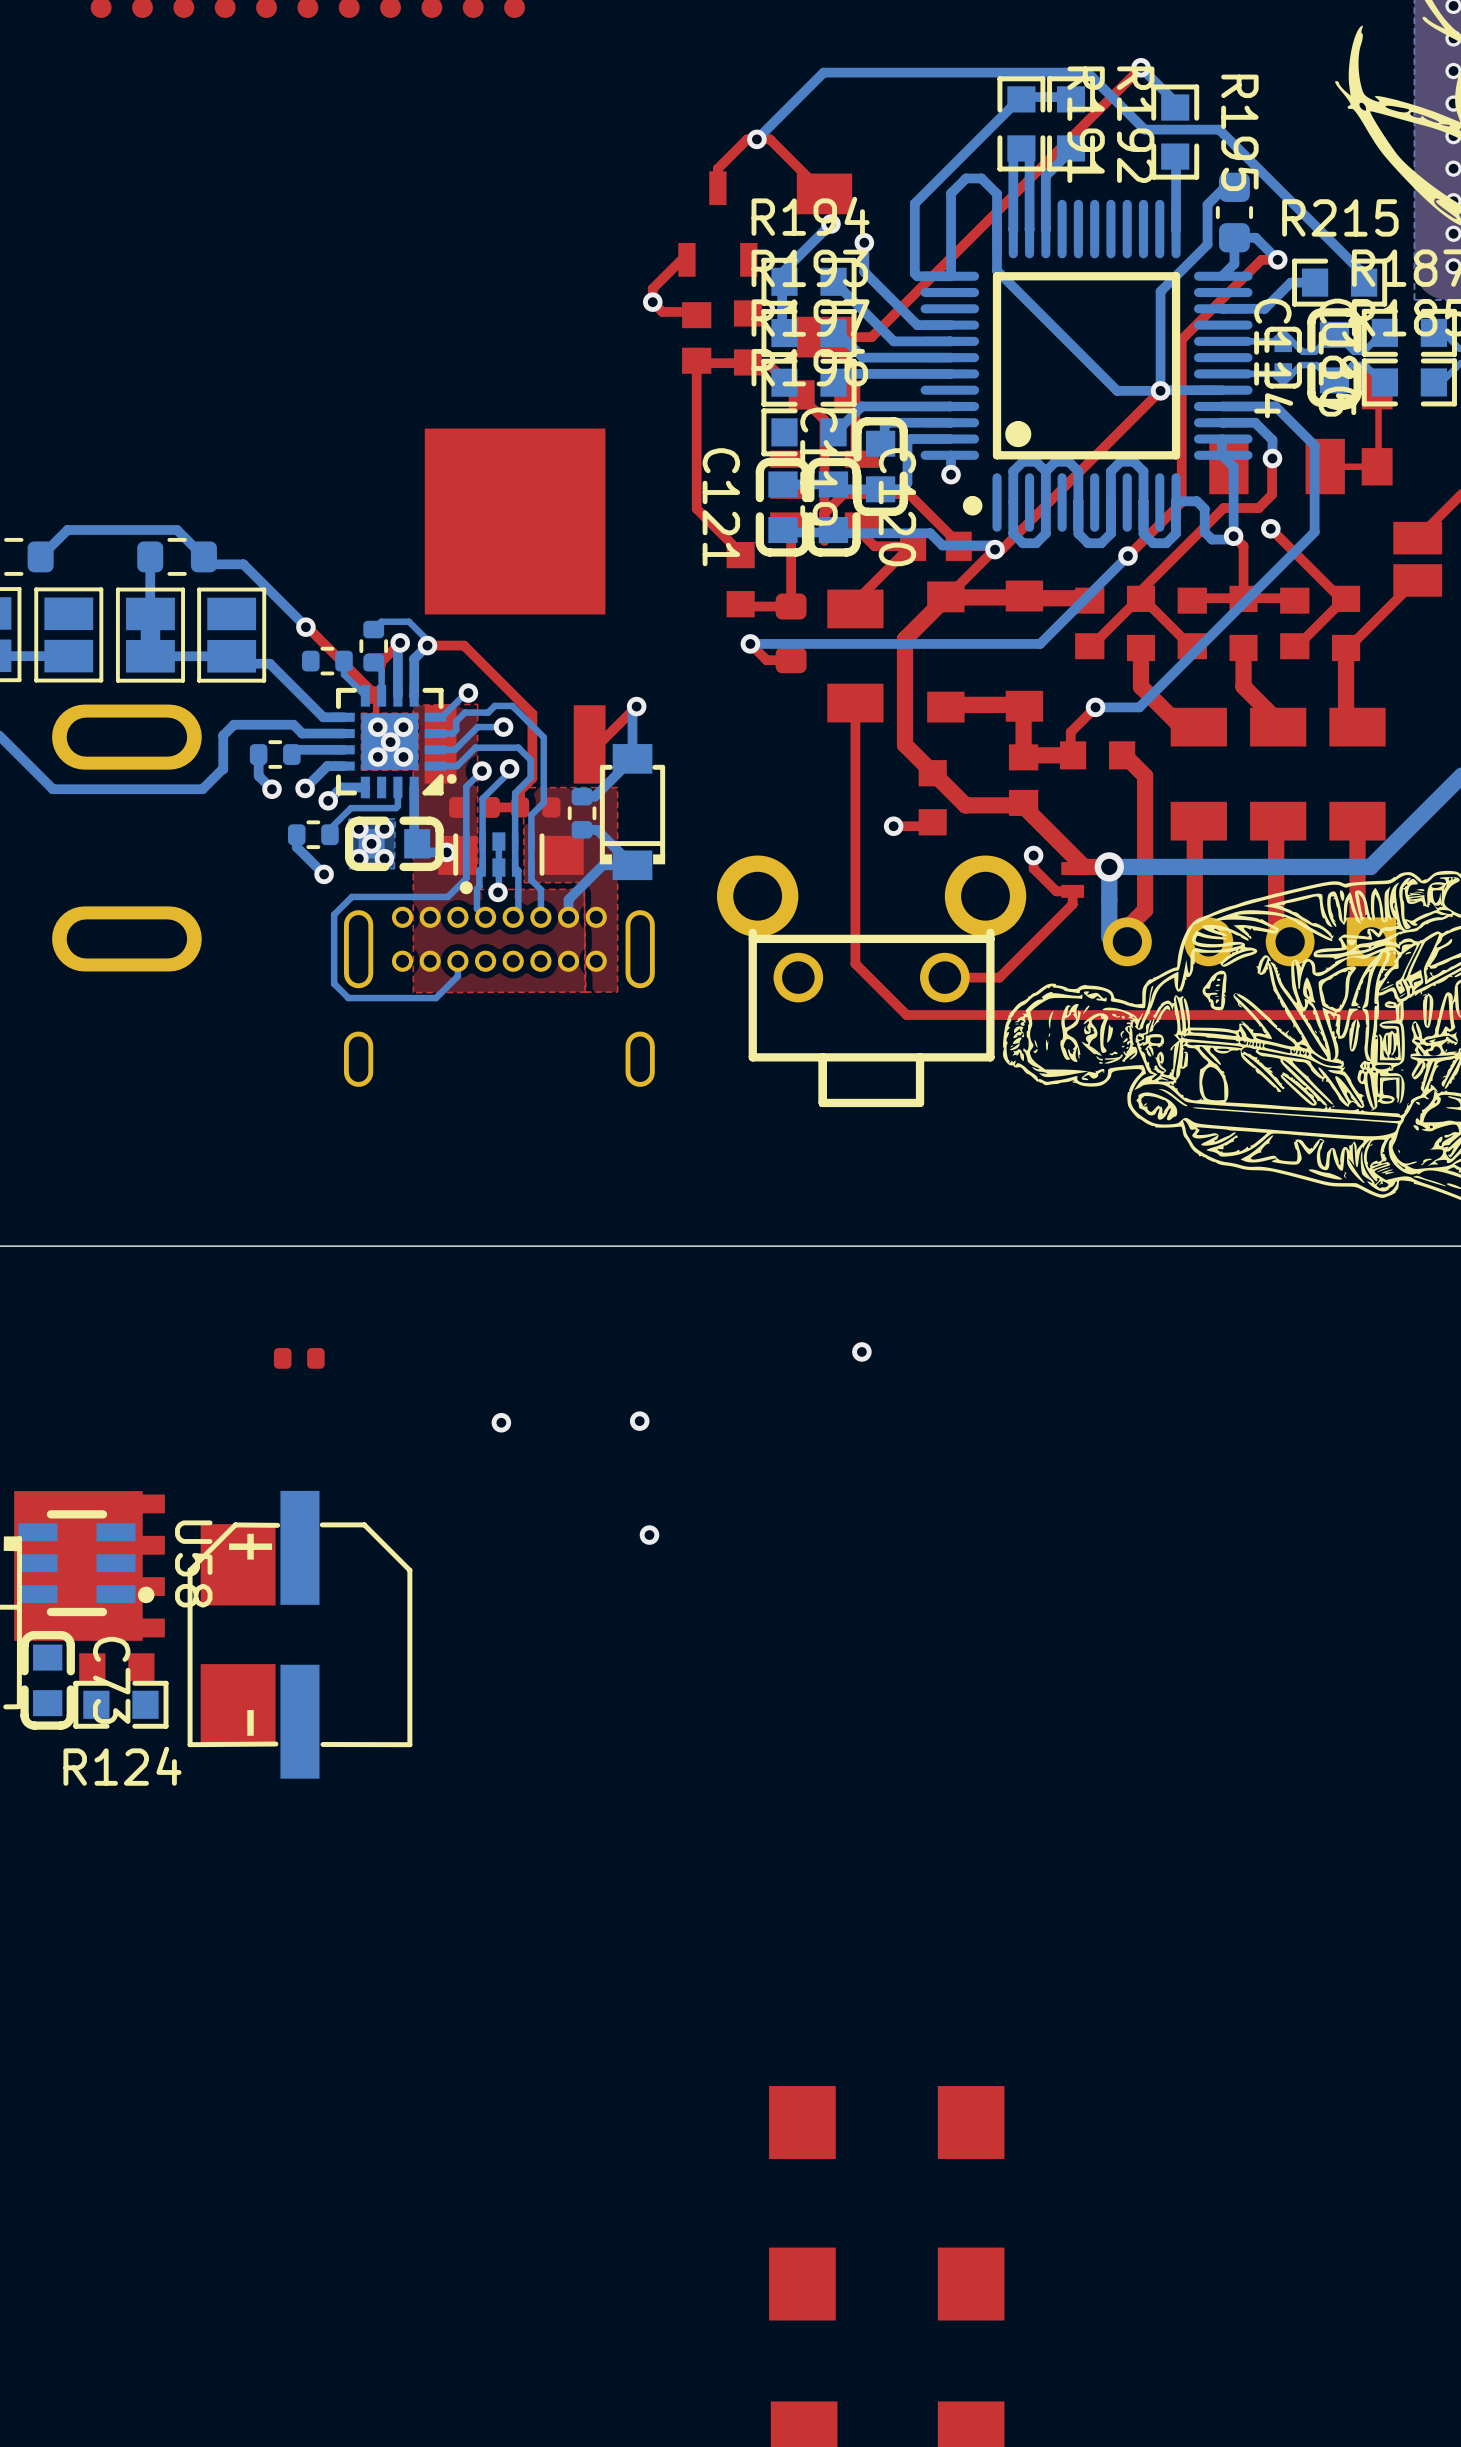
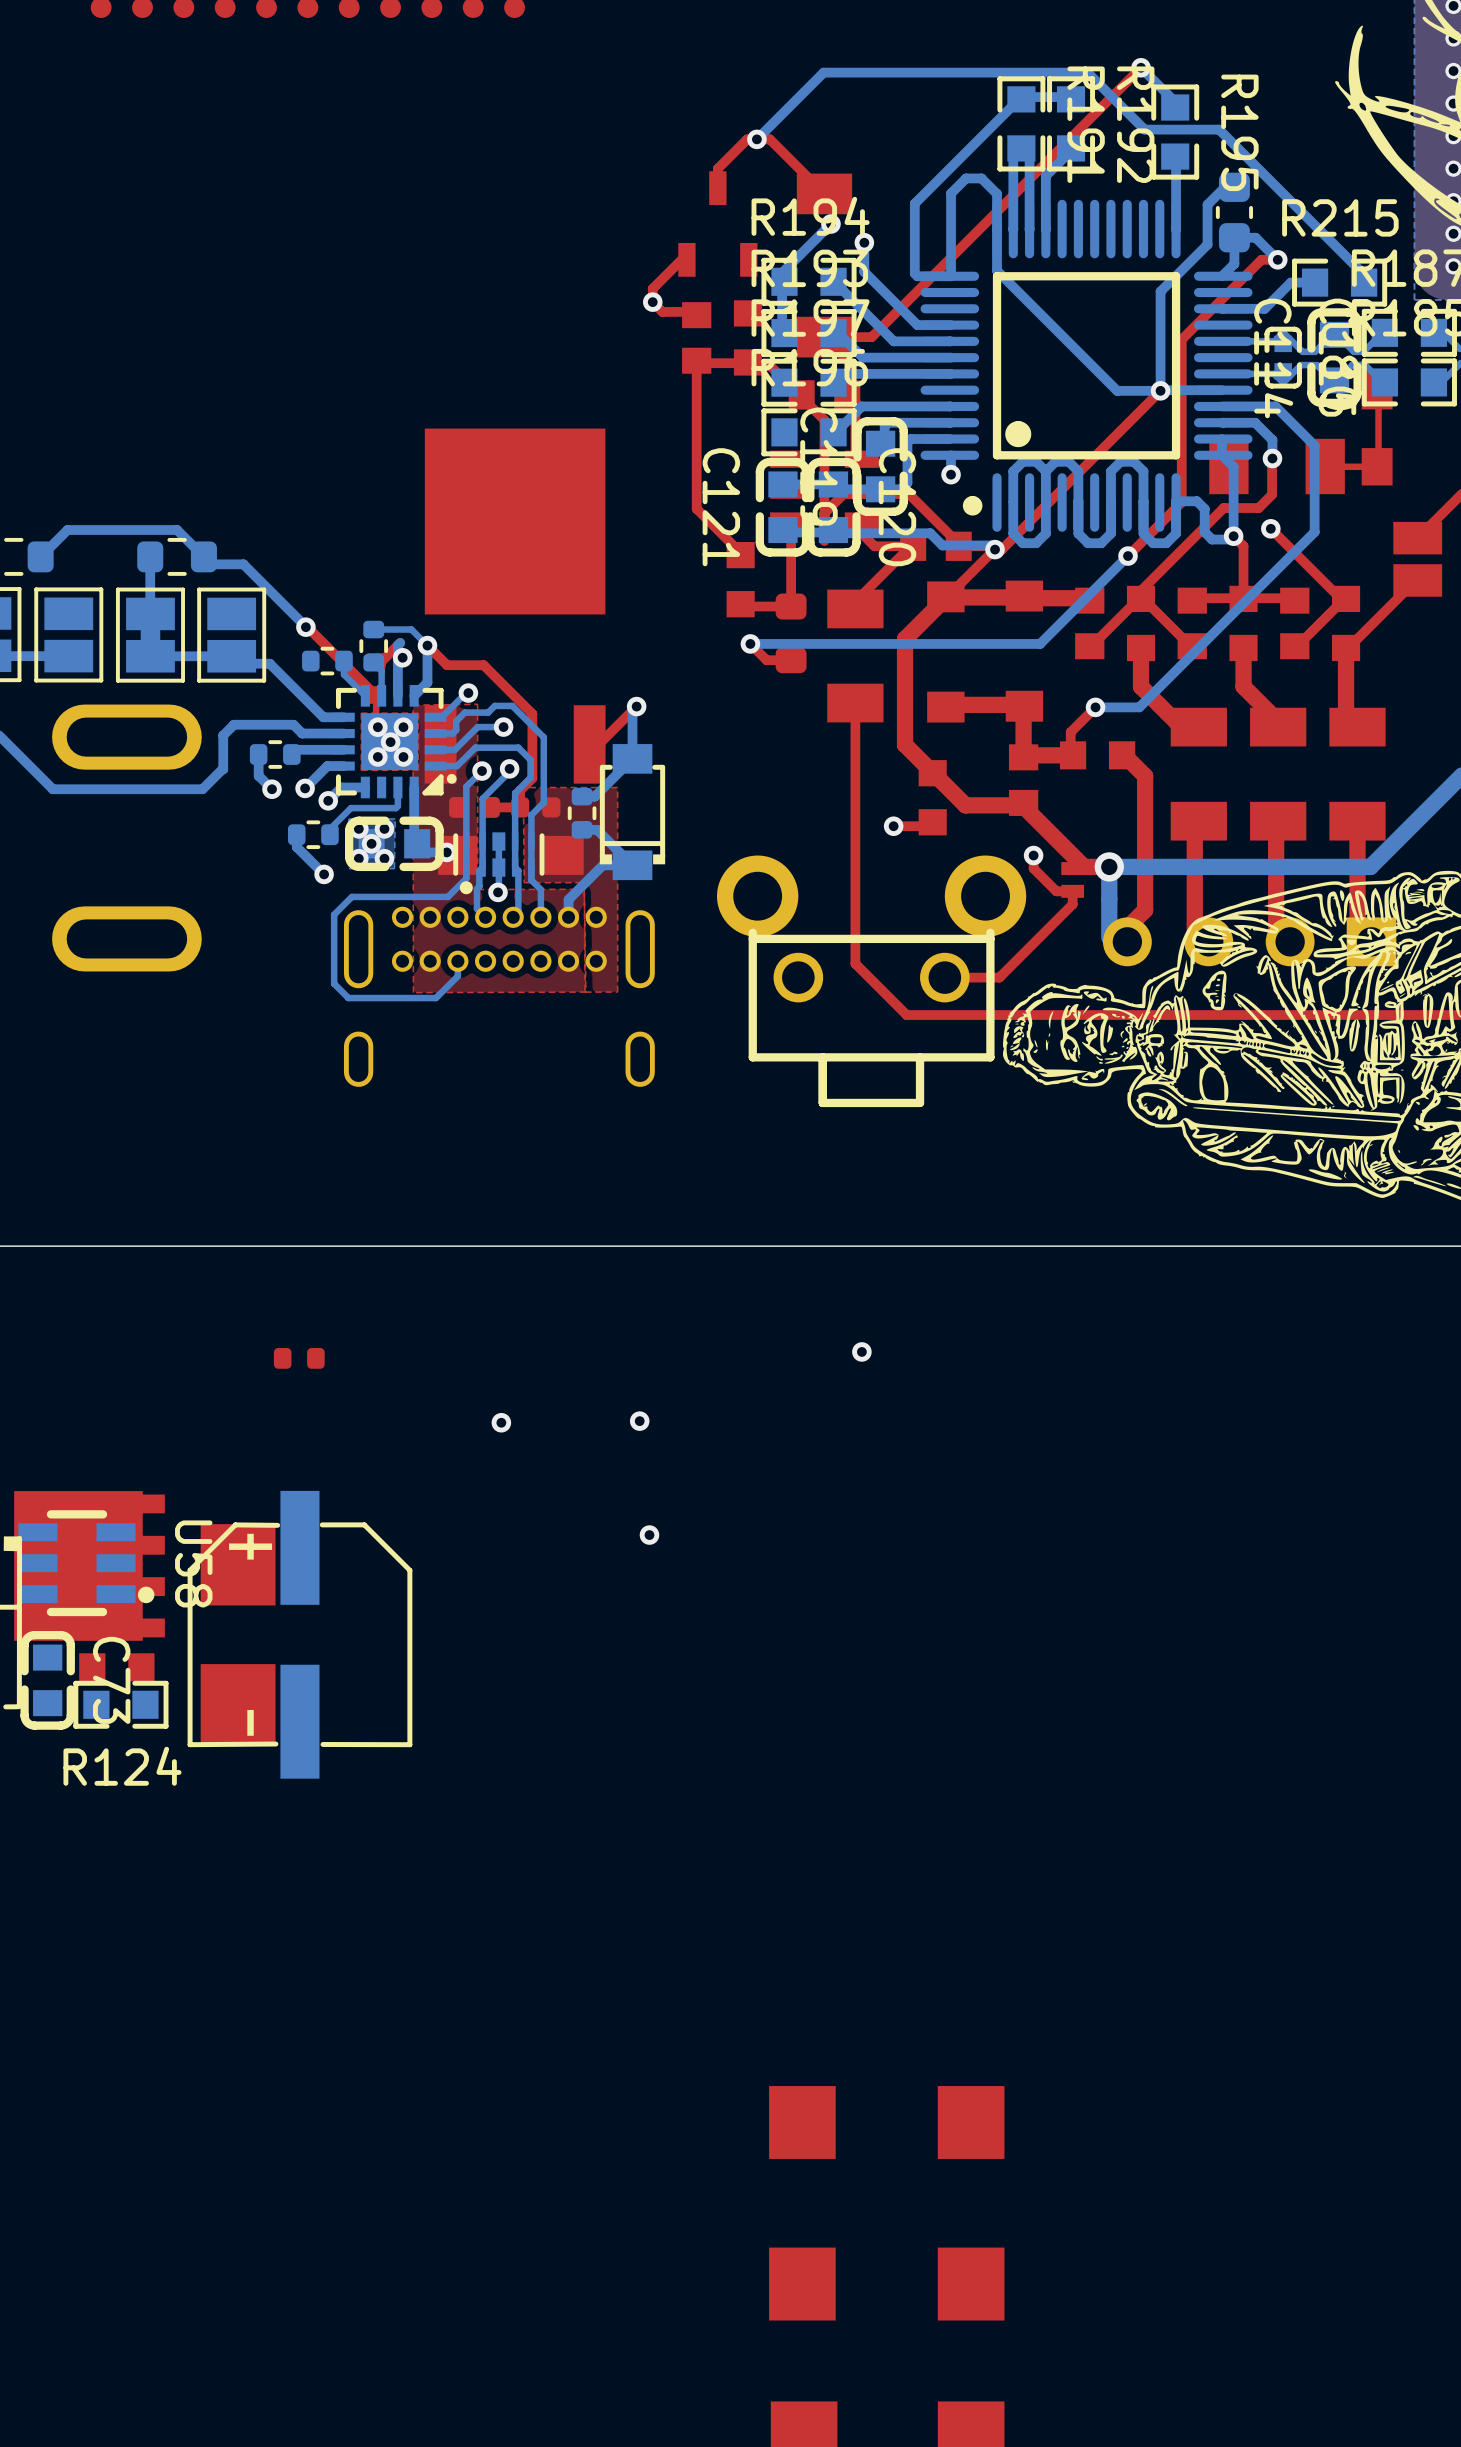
bottom track: (373, 629) (381, 621) (409, 621) (427, 640) (427, 645) (414, 658) (414, 695) -> (373, 629) (411, 629) (427, 645) (427, 682) (414, 695)
via position: (400, 642) -> (402, 657)
top track: (427, 645) (464, 645) (483, 665) -> (427, 645) (447, 665) (483, 665)

